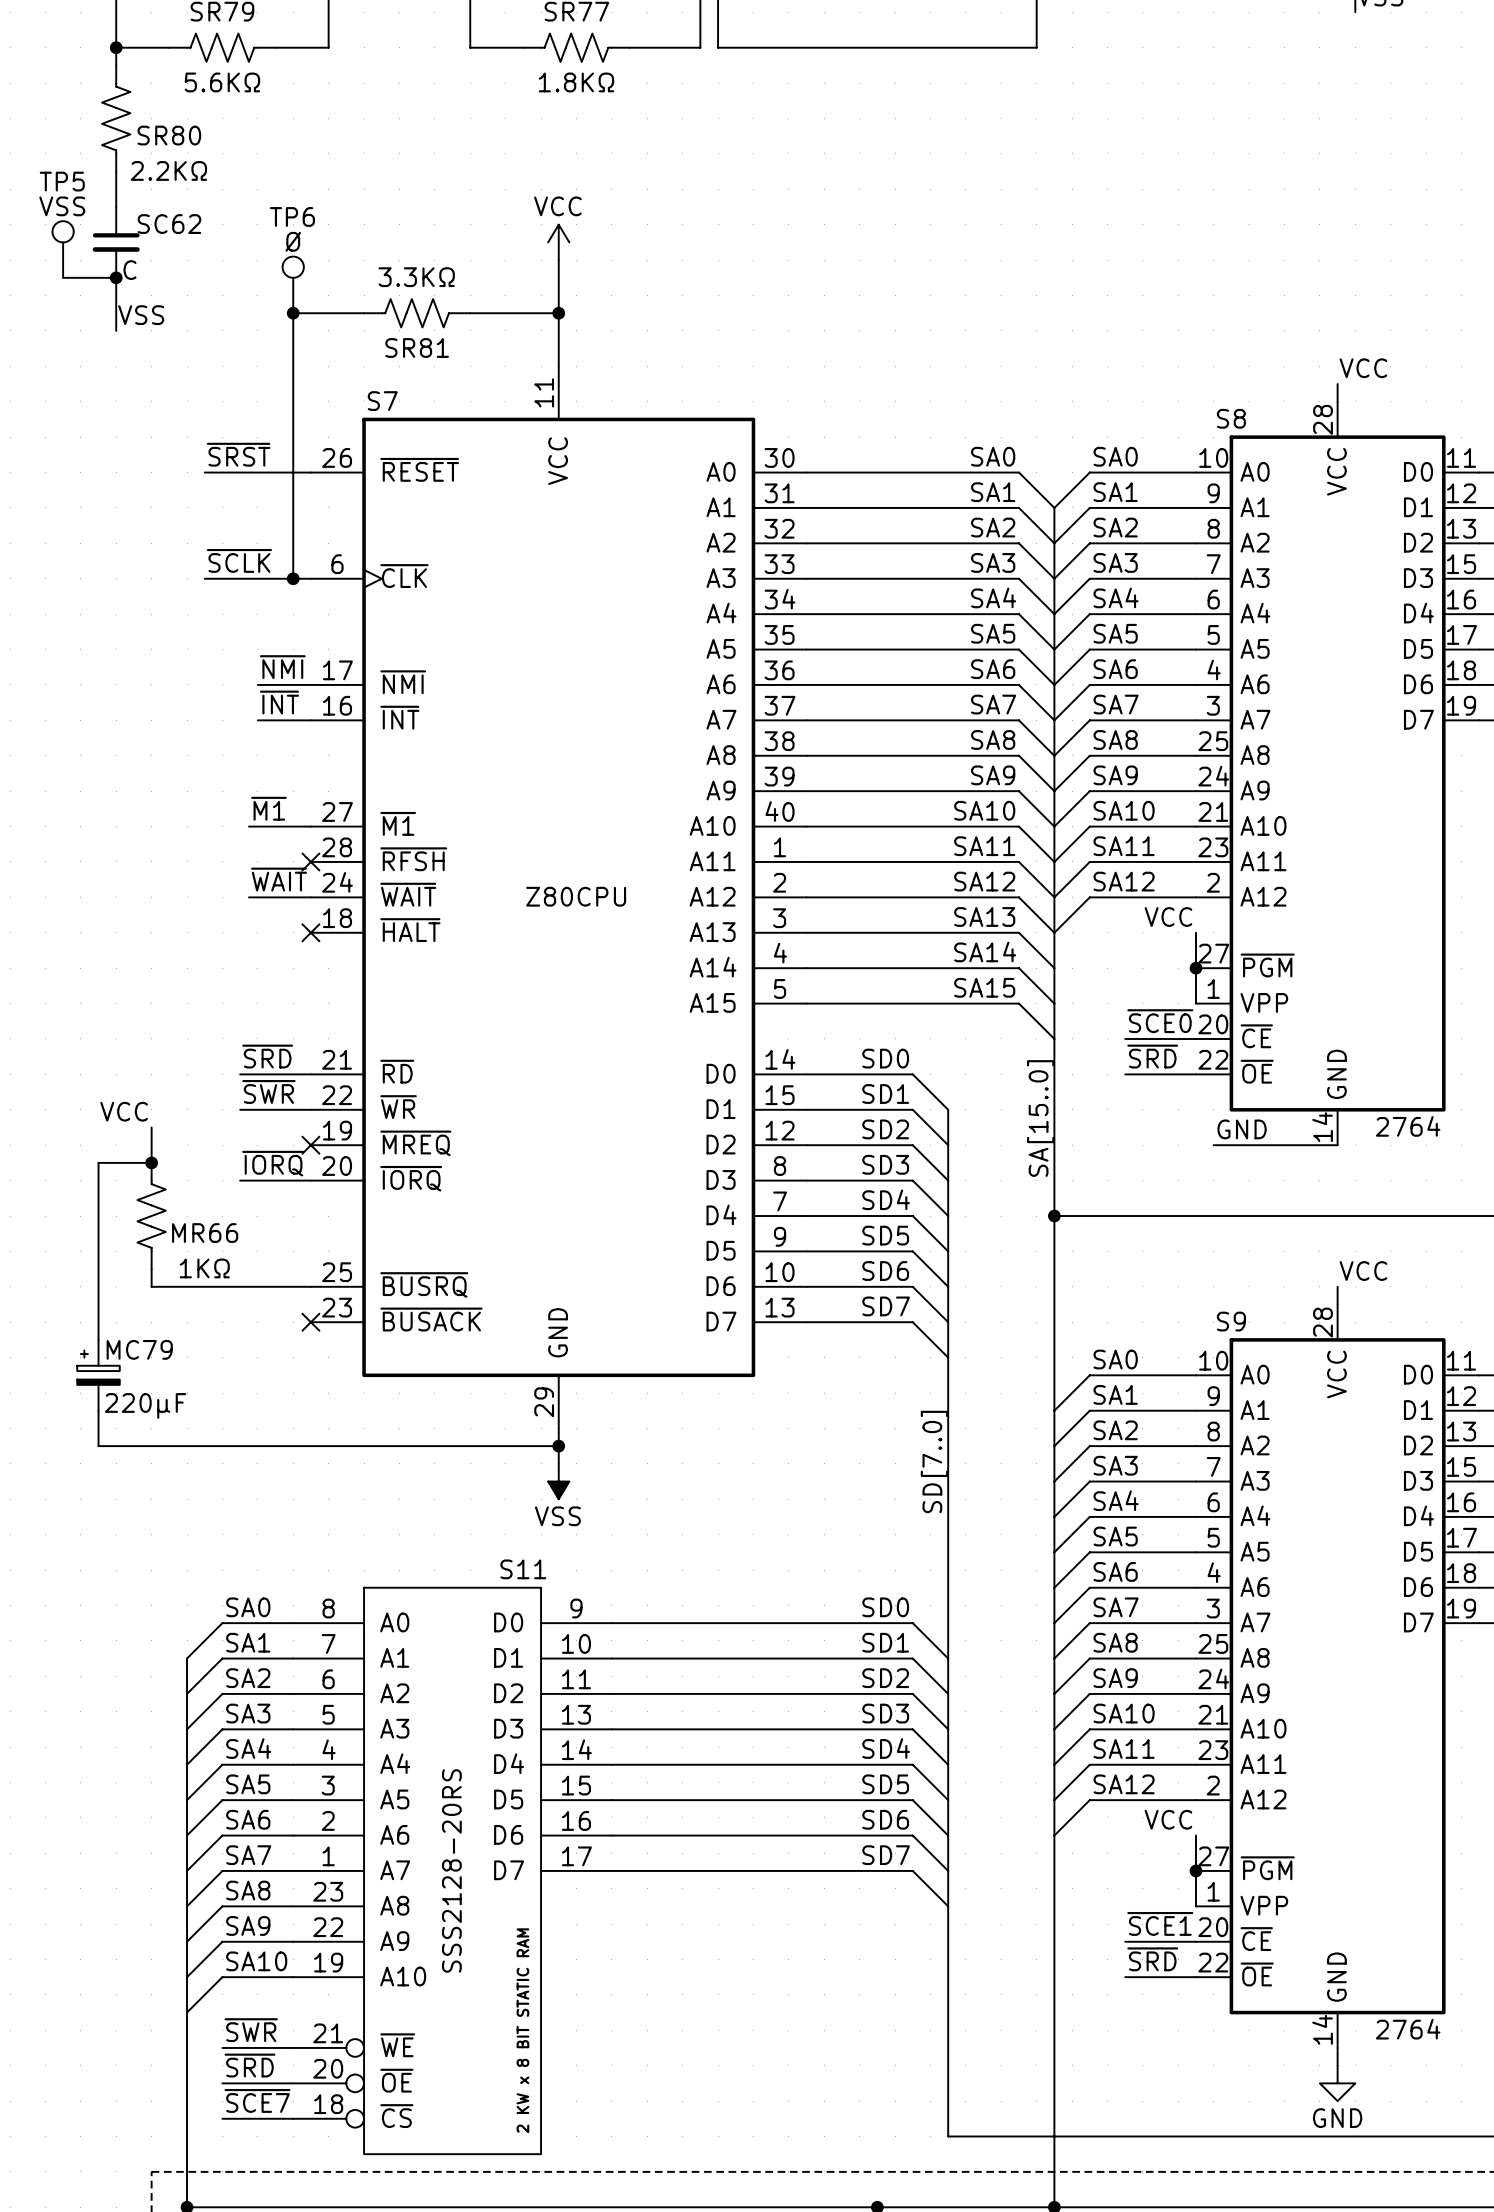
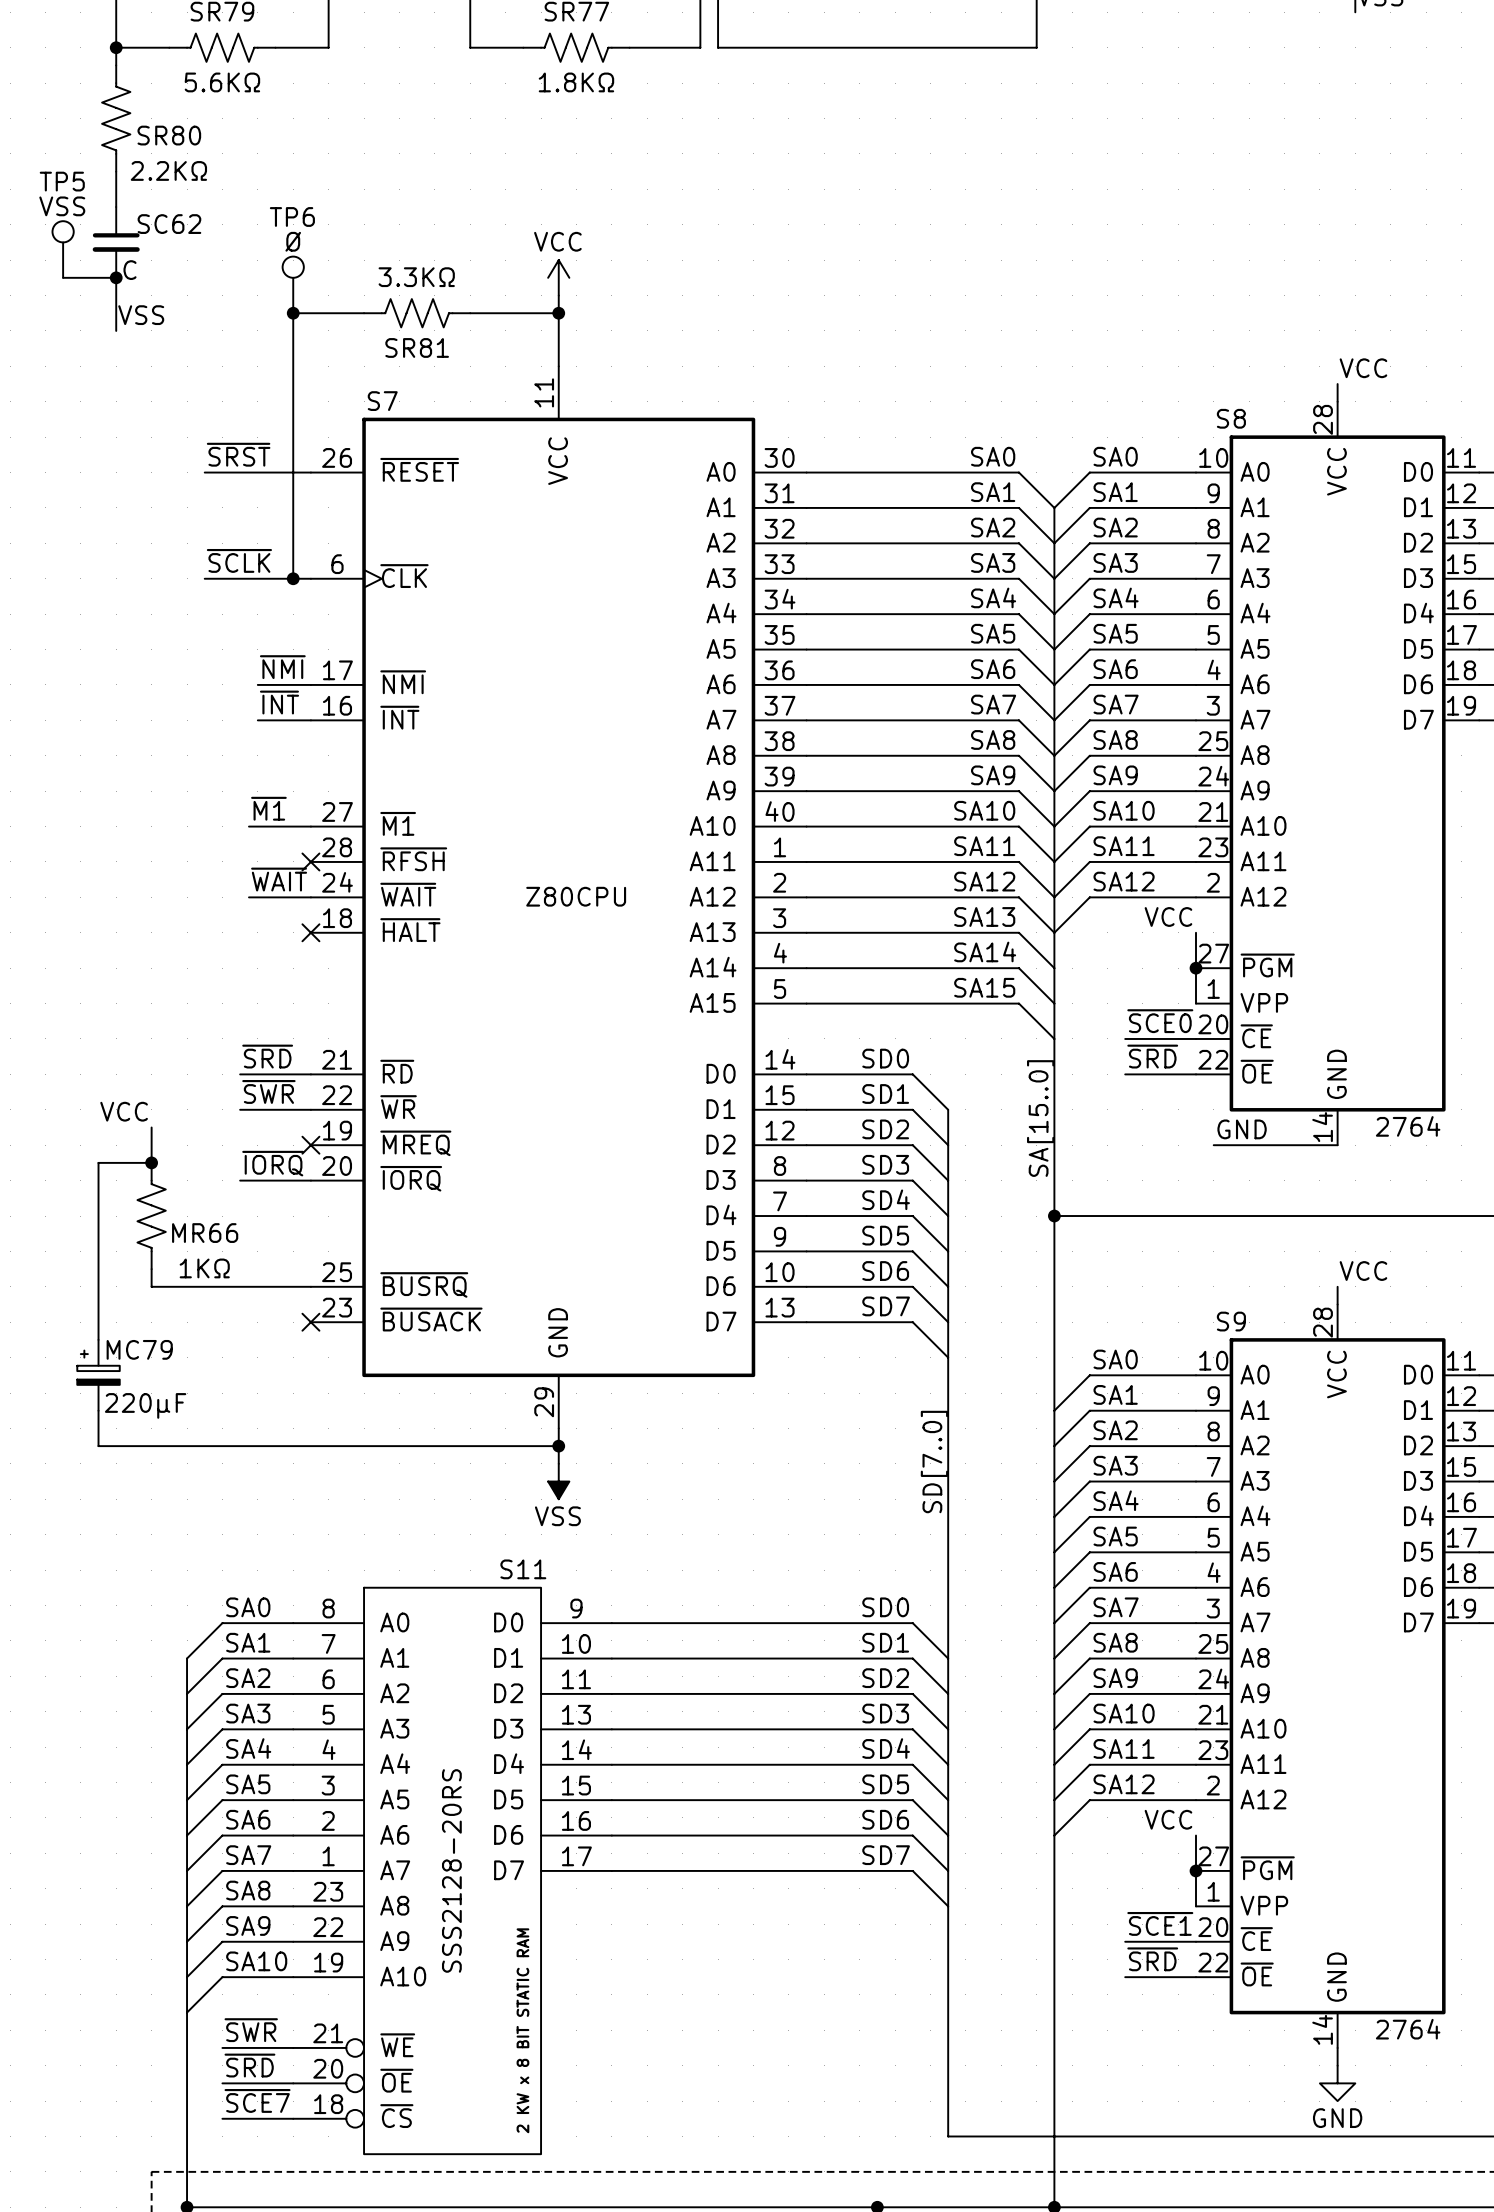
power symbol position: VCC (558, 242) -> VCC (558, 277)

